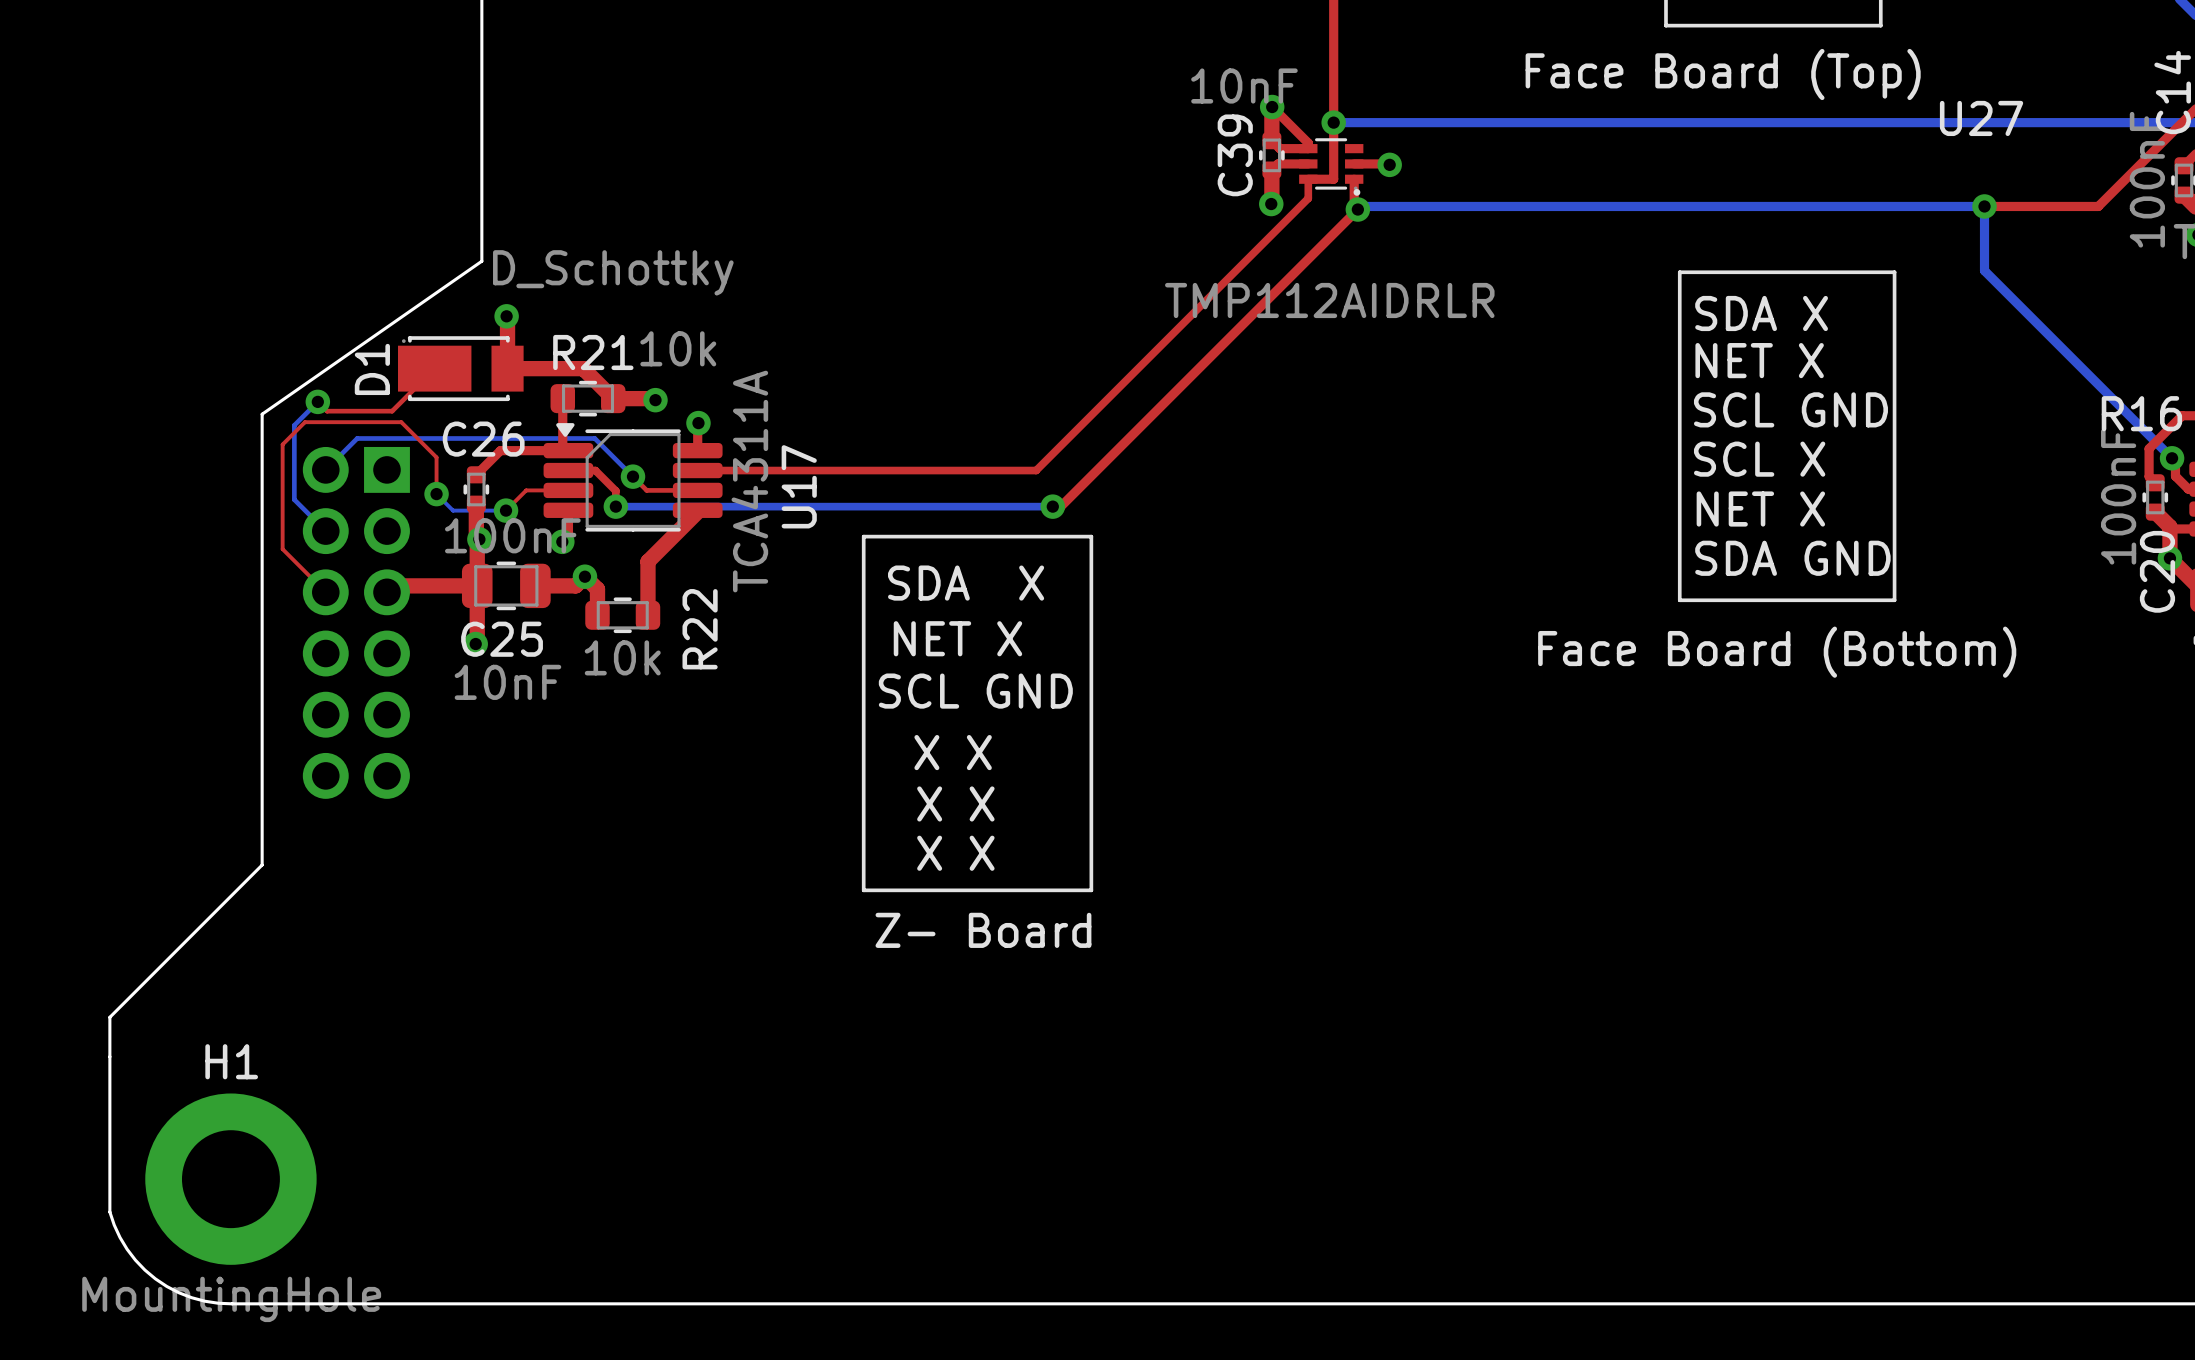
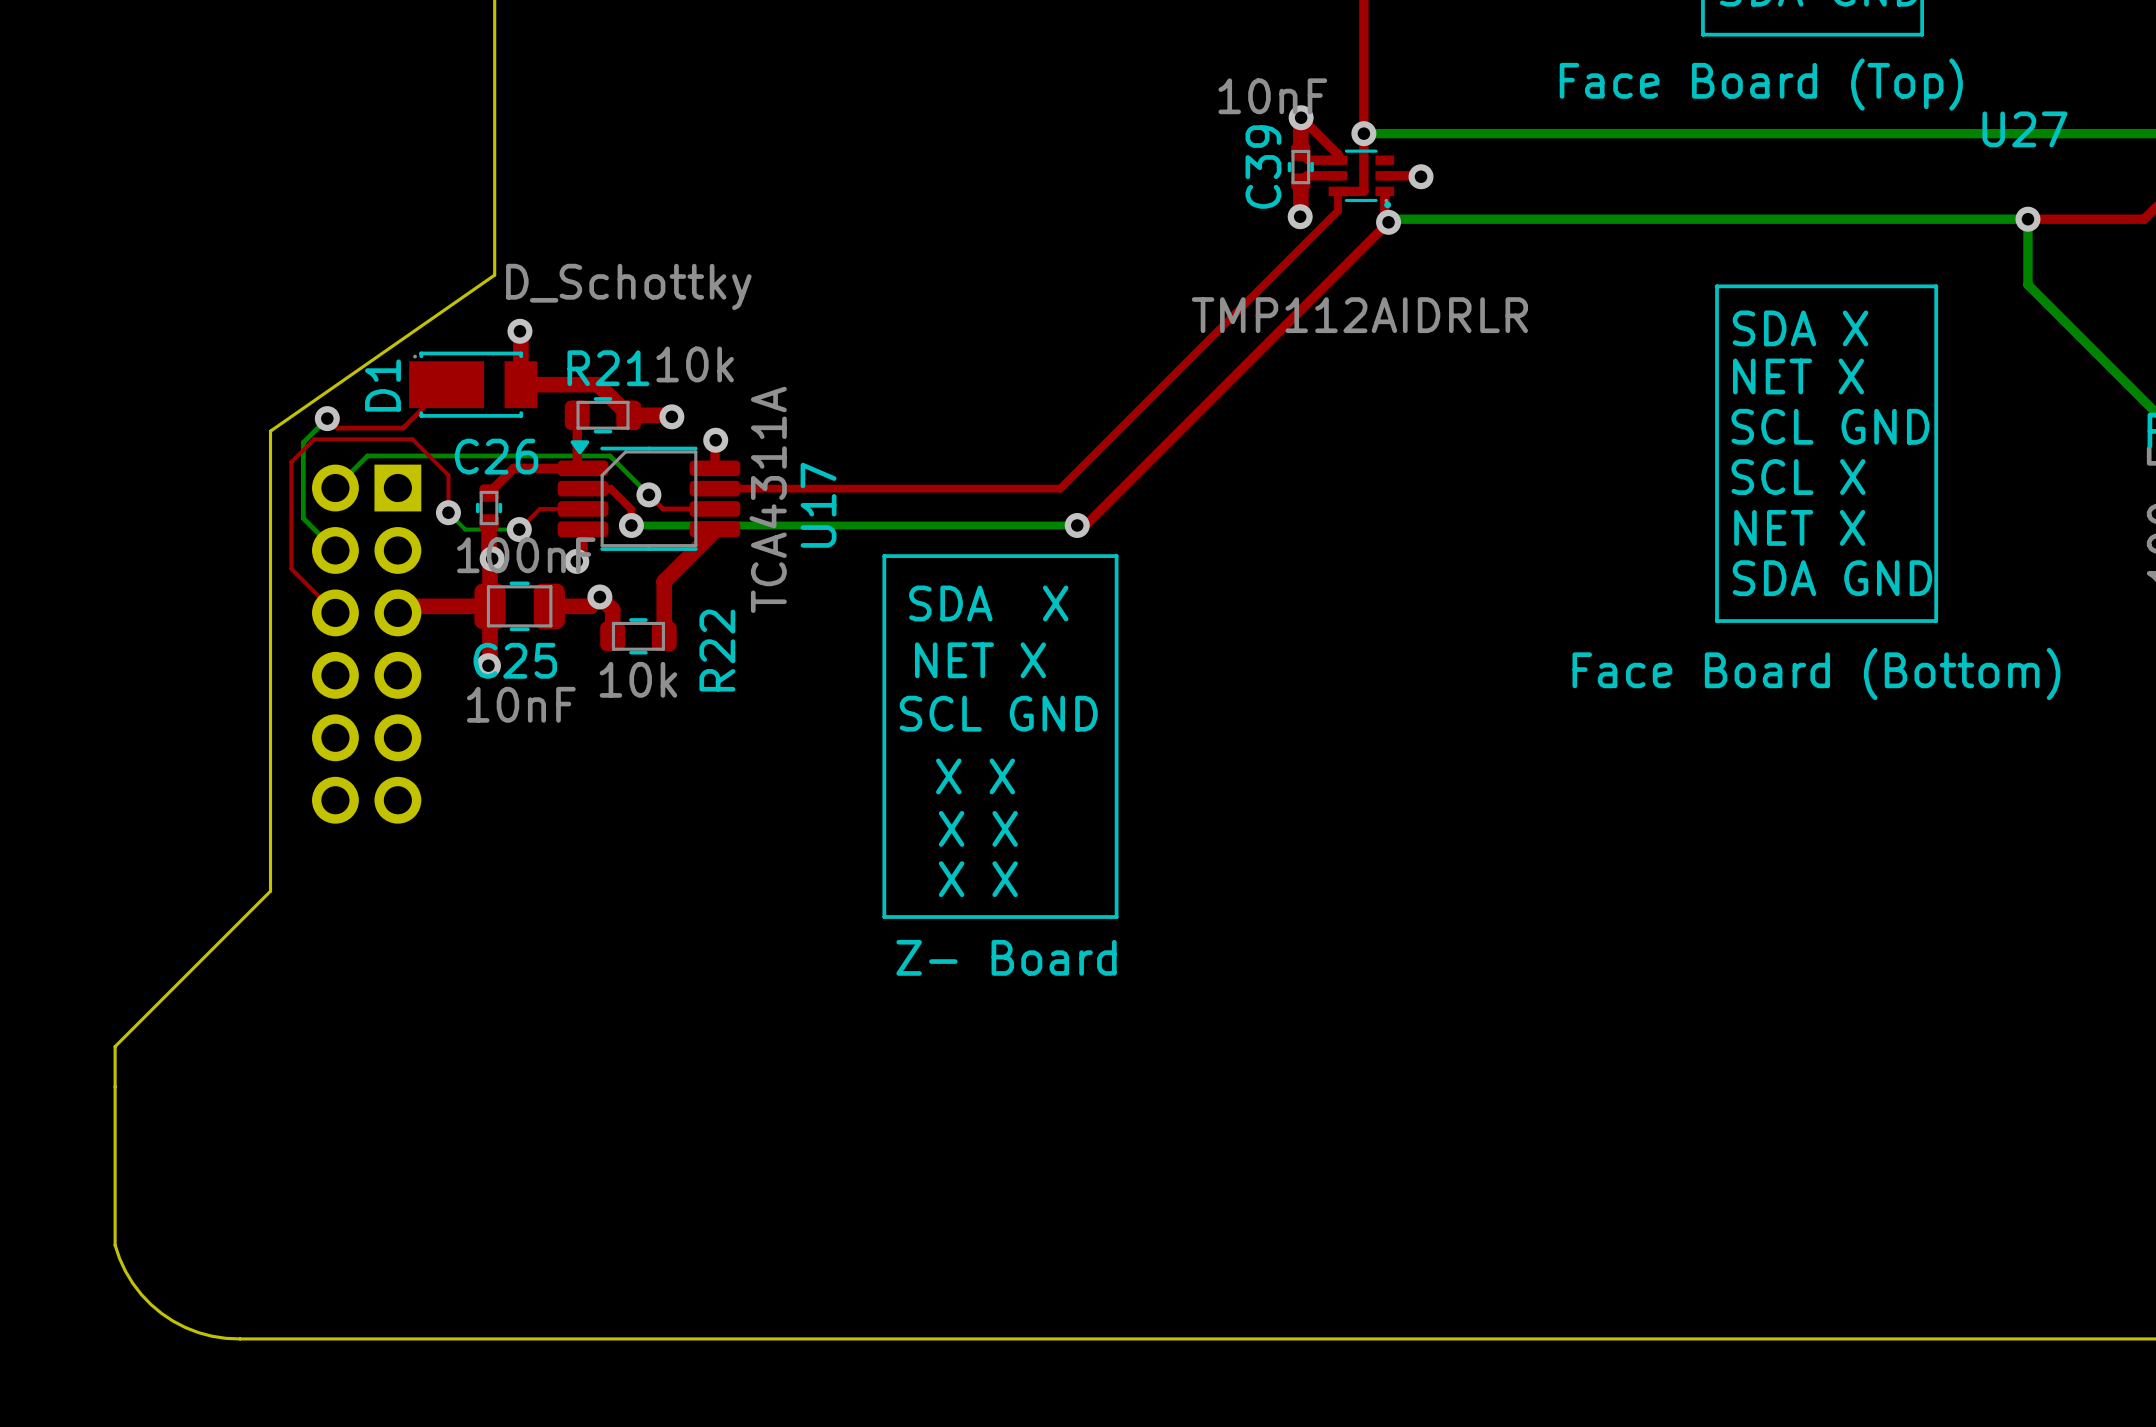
H1: MountingHole (230, 1179) -> none

